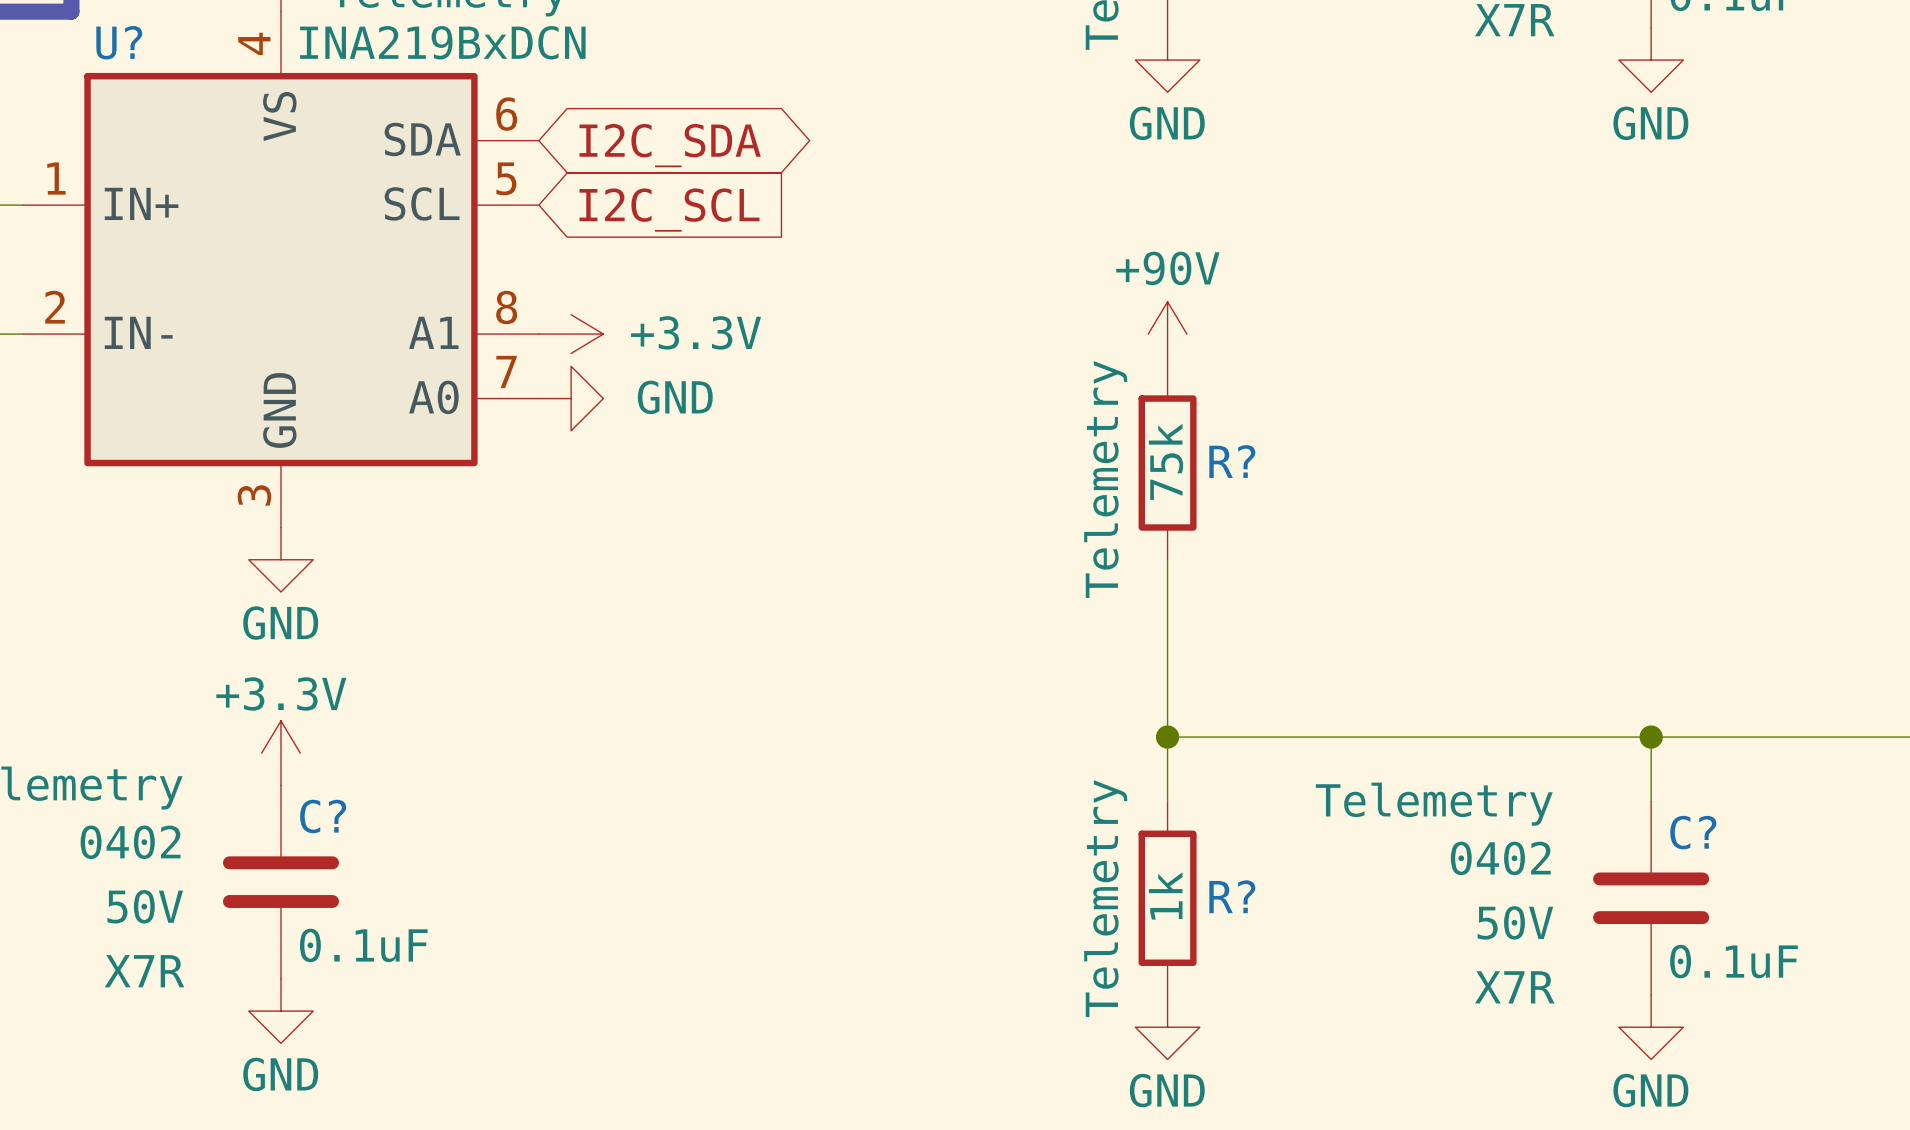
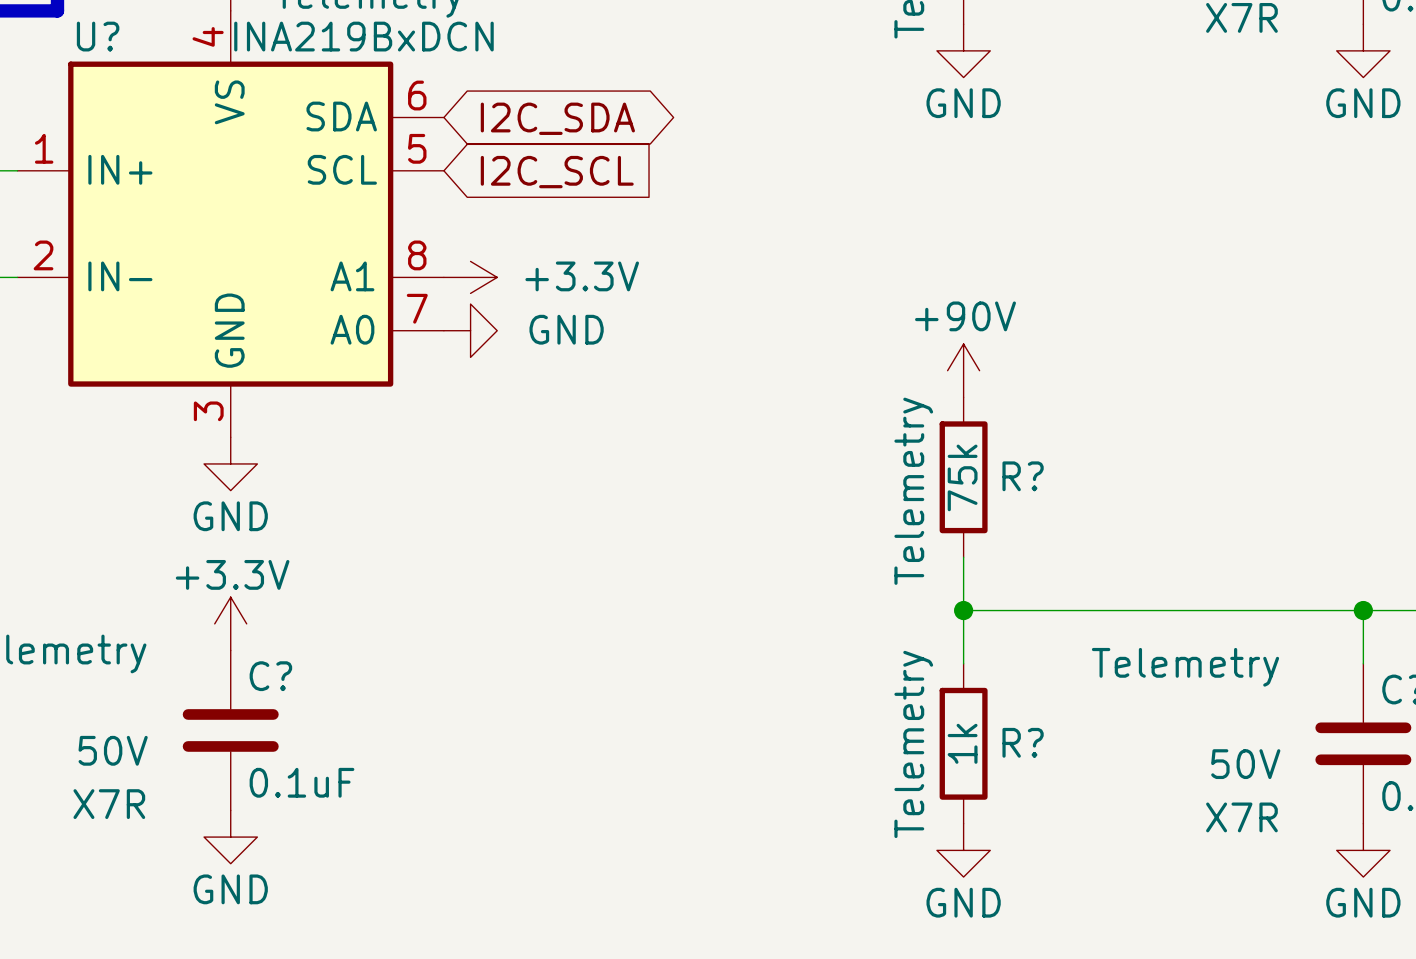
power symbol position: +90V (1167, 334) -> +90V (963, 370)
R? position: (1167, 463) -> (963, 477)
wire: (1167, 559) (1167, 672) -> none
C? text: 0402 (130, 842) -> none
C? text: 0402 (1500, 858) -> none

